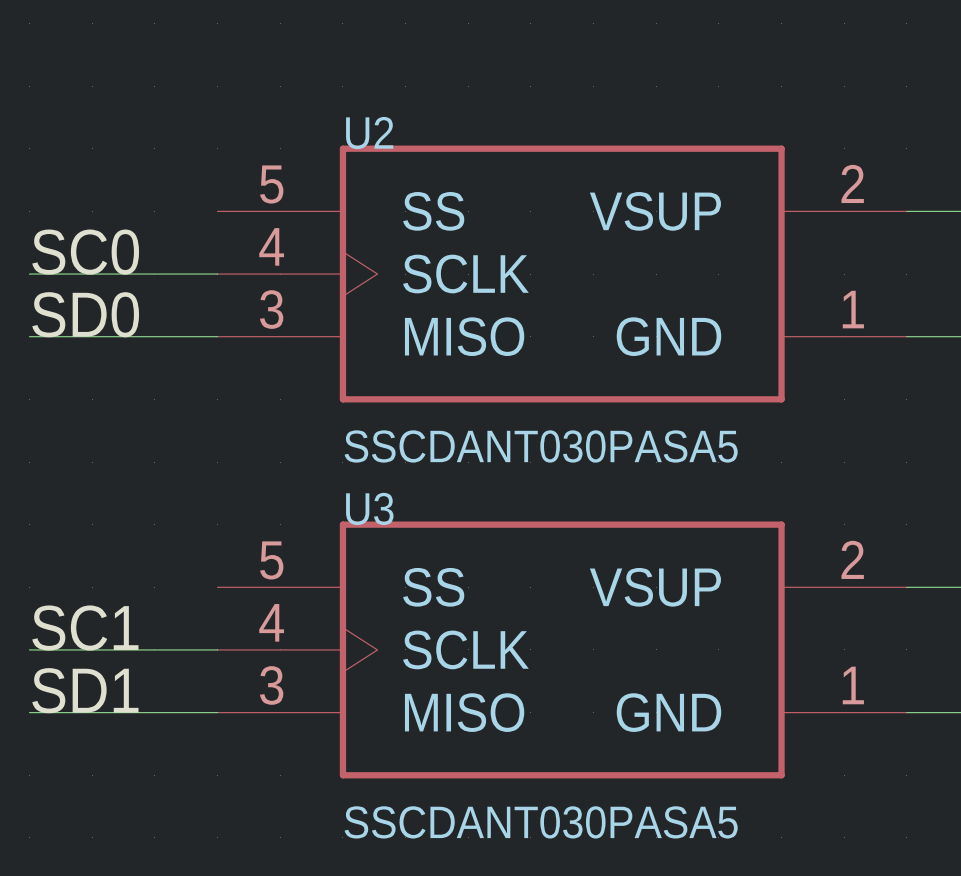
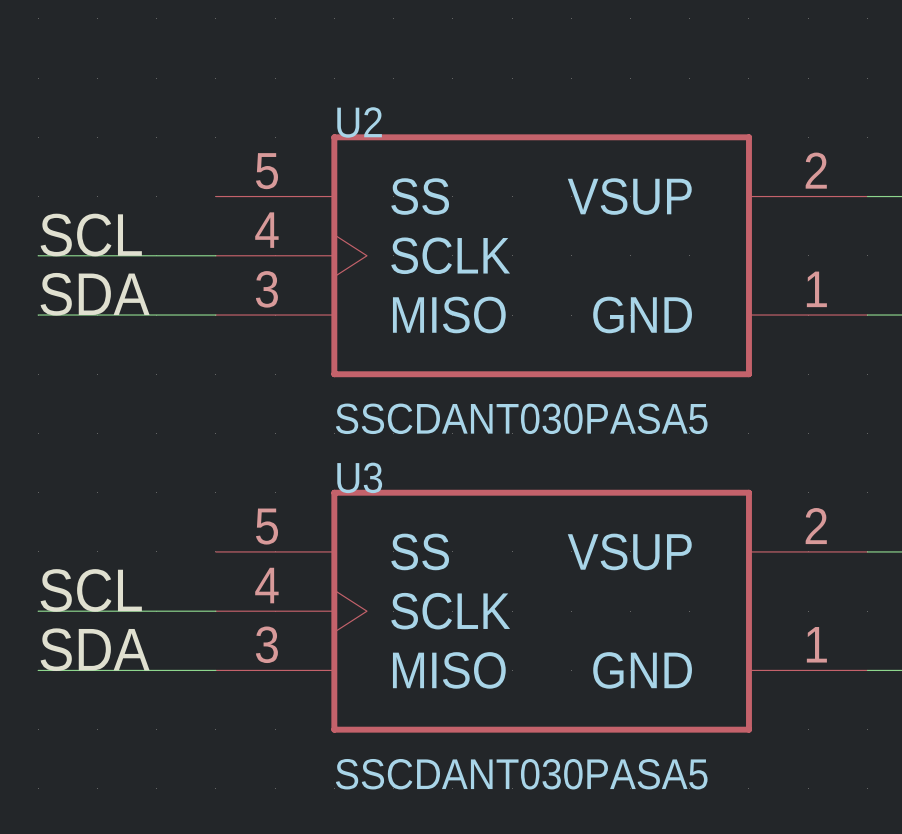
label: SC0 (85, 252) -> SCL (91, 235)
label: SD0 (85, 314) -> SDA (95, 294)
label: SC1 (85, 628) -> SCL (91, 590)
label: SD1 (85, 690) -> SDA (95, 649)

